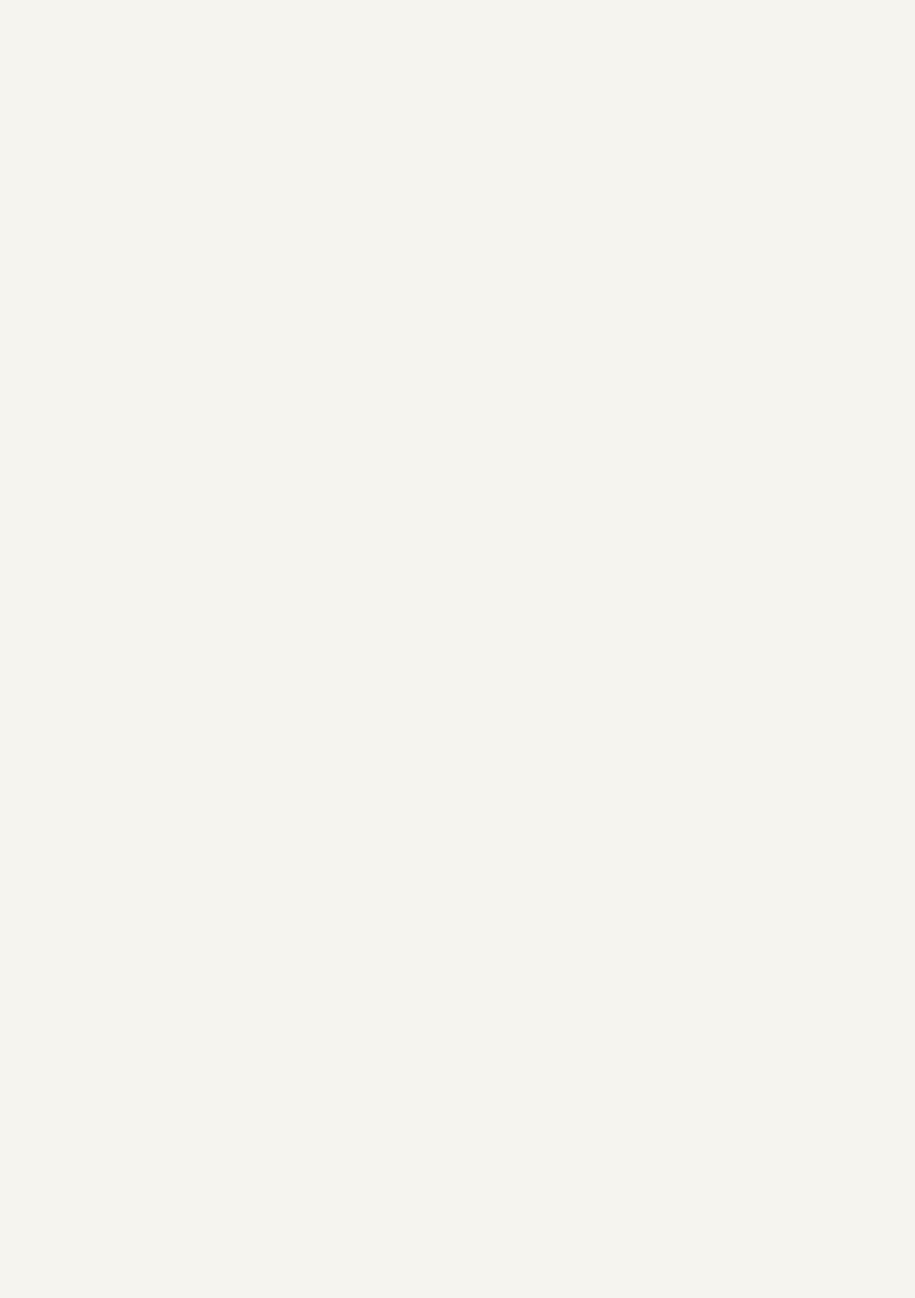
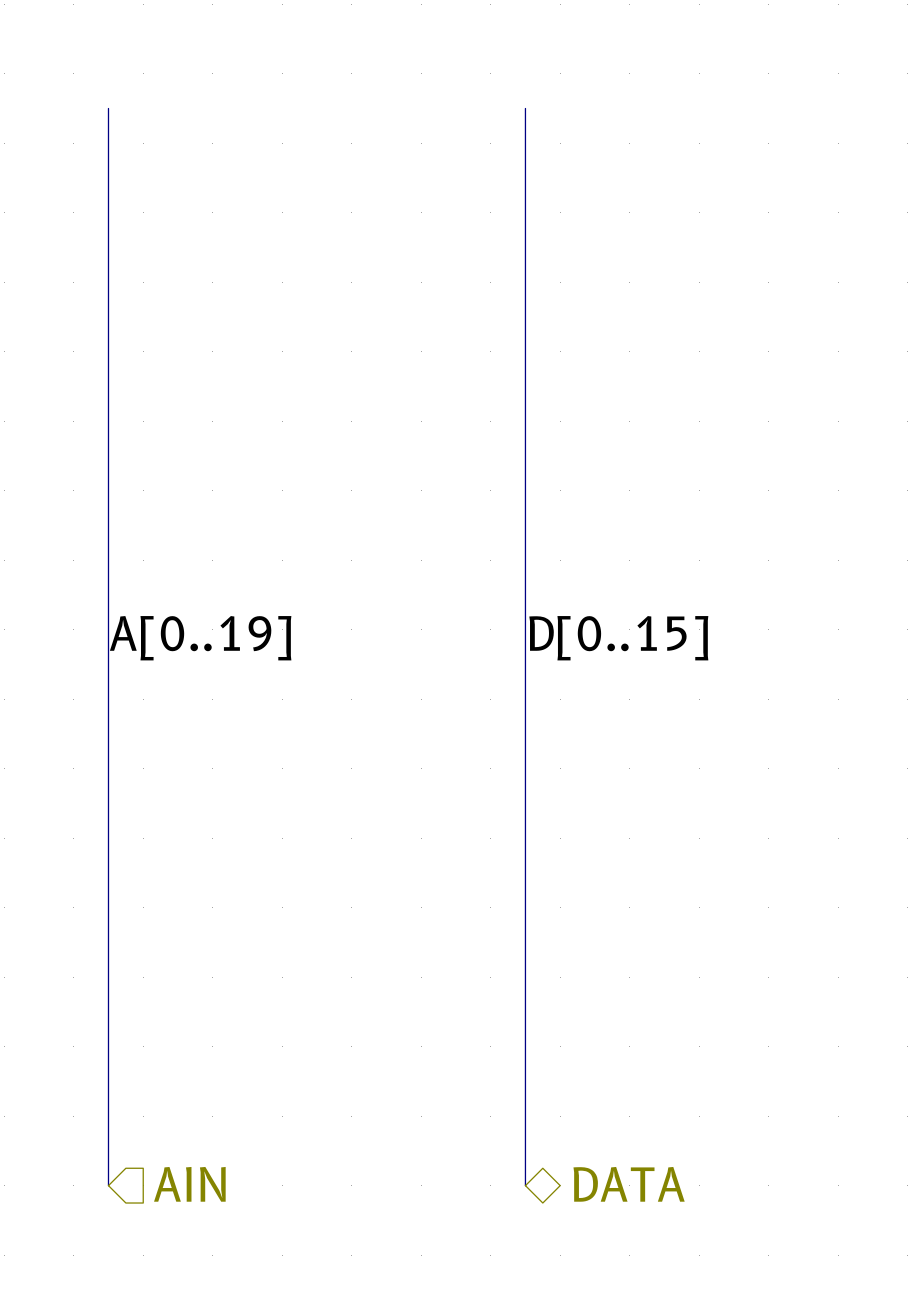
bus: none -> (108, 108) (108, 1185)
bus: none -> (525, 108) (525, 1185)
label: none -> A[0..19] (200, 638)
label: none -> D[0..15] (618, 638)
hierarchical label: none -> AIN (189, 1184)
hierarchical label: none -> DATA (629, 1184)

